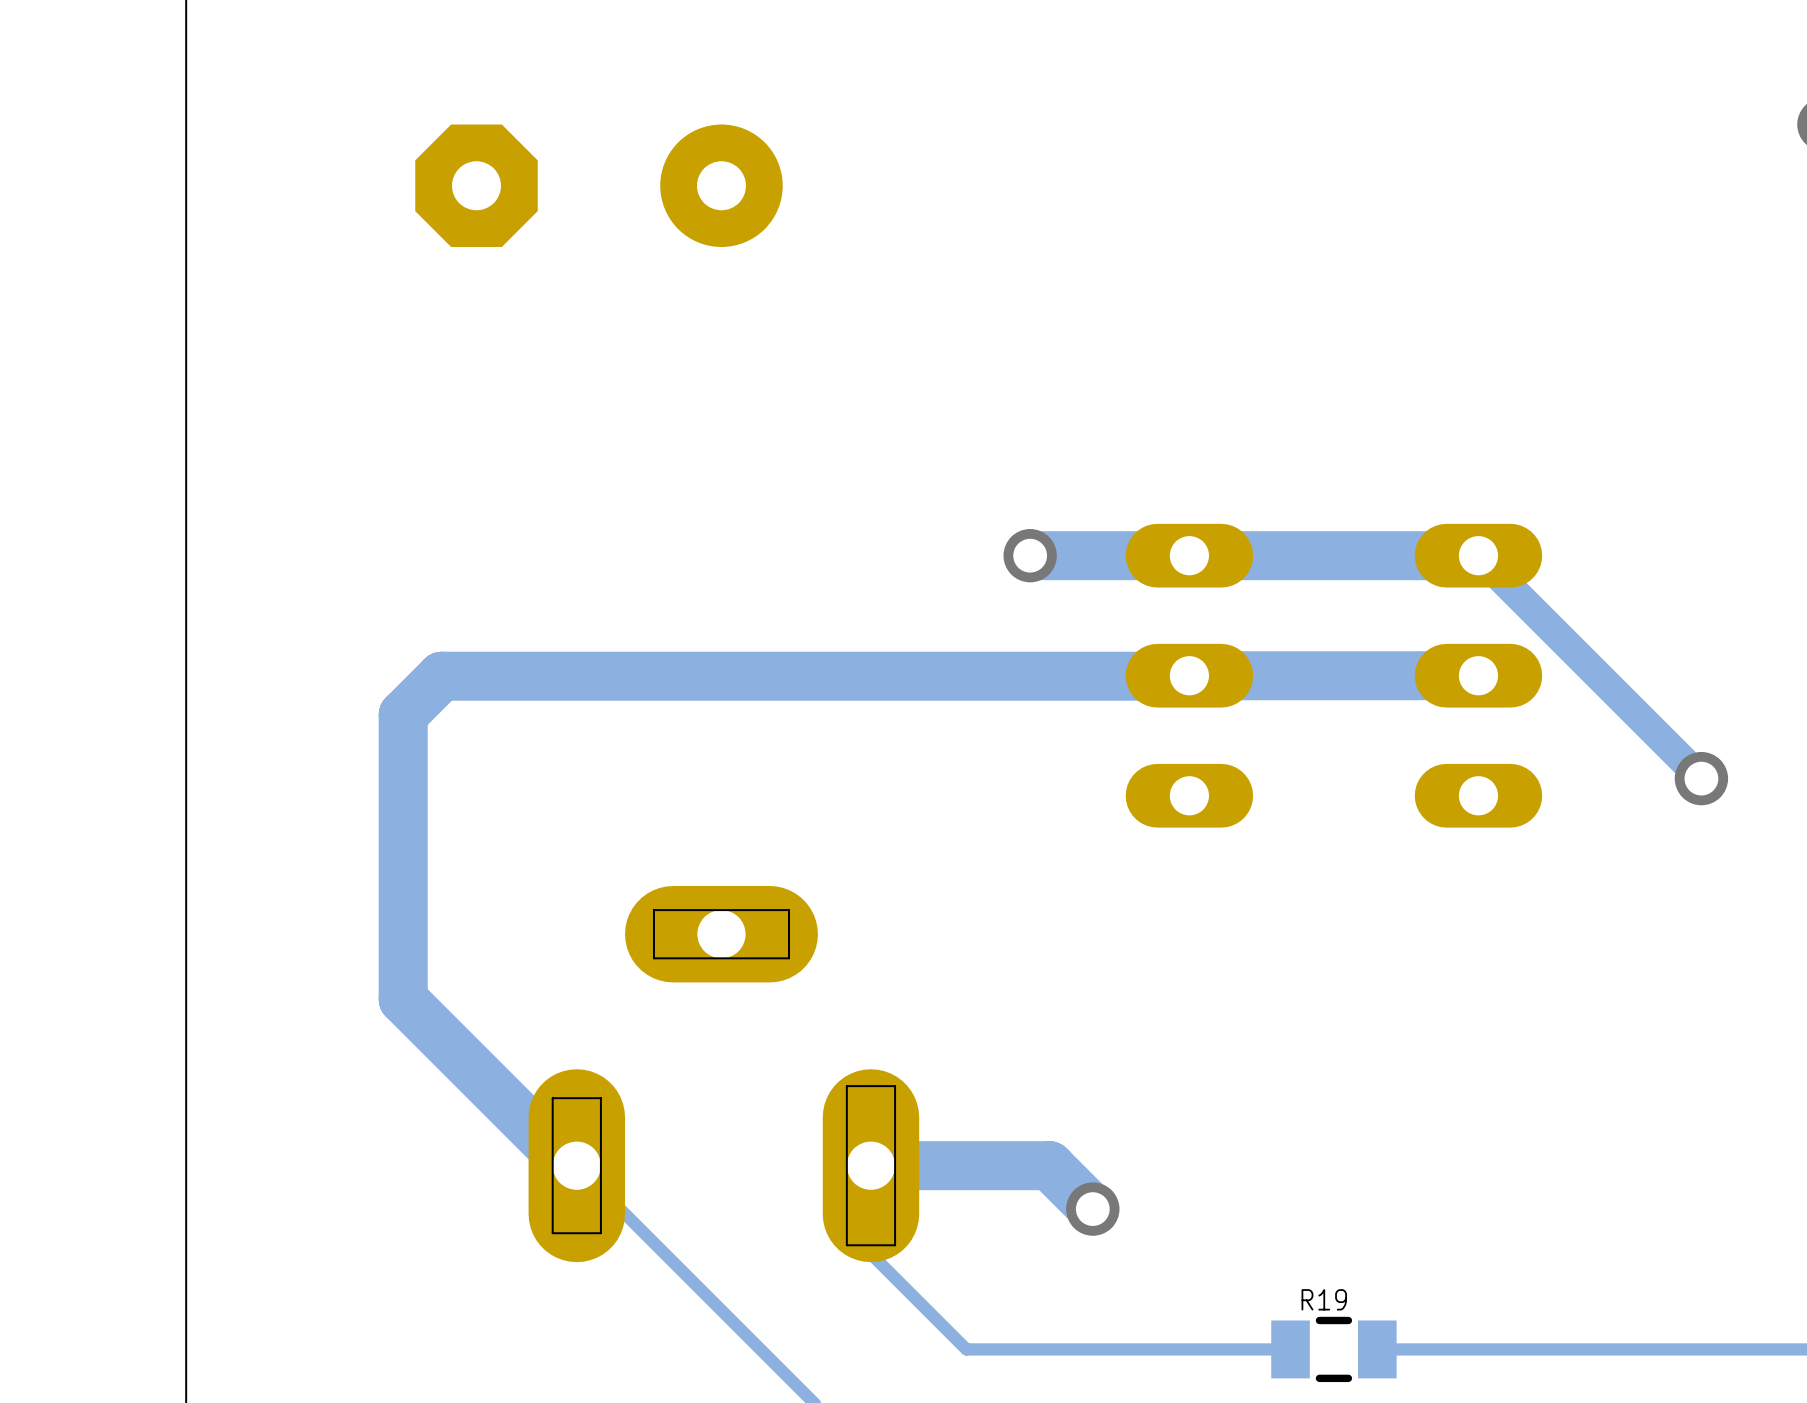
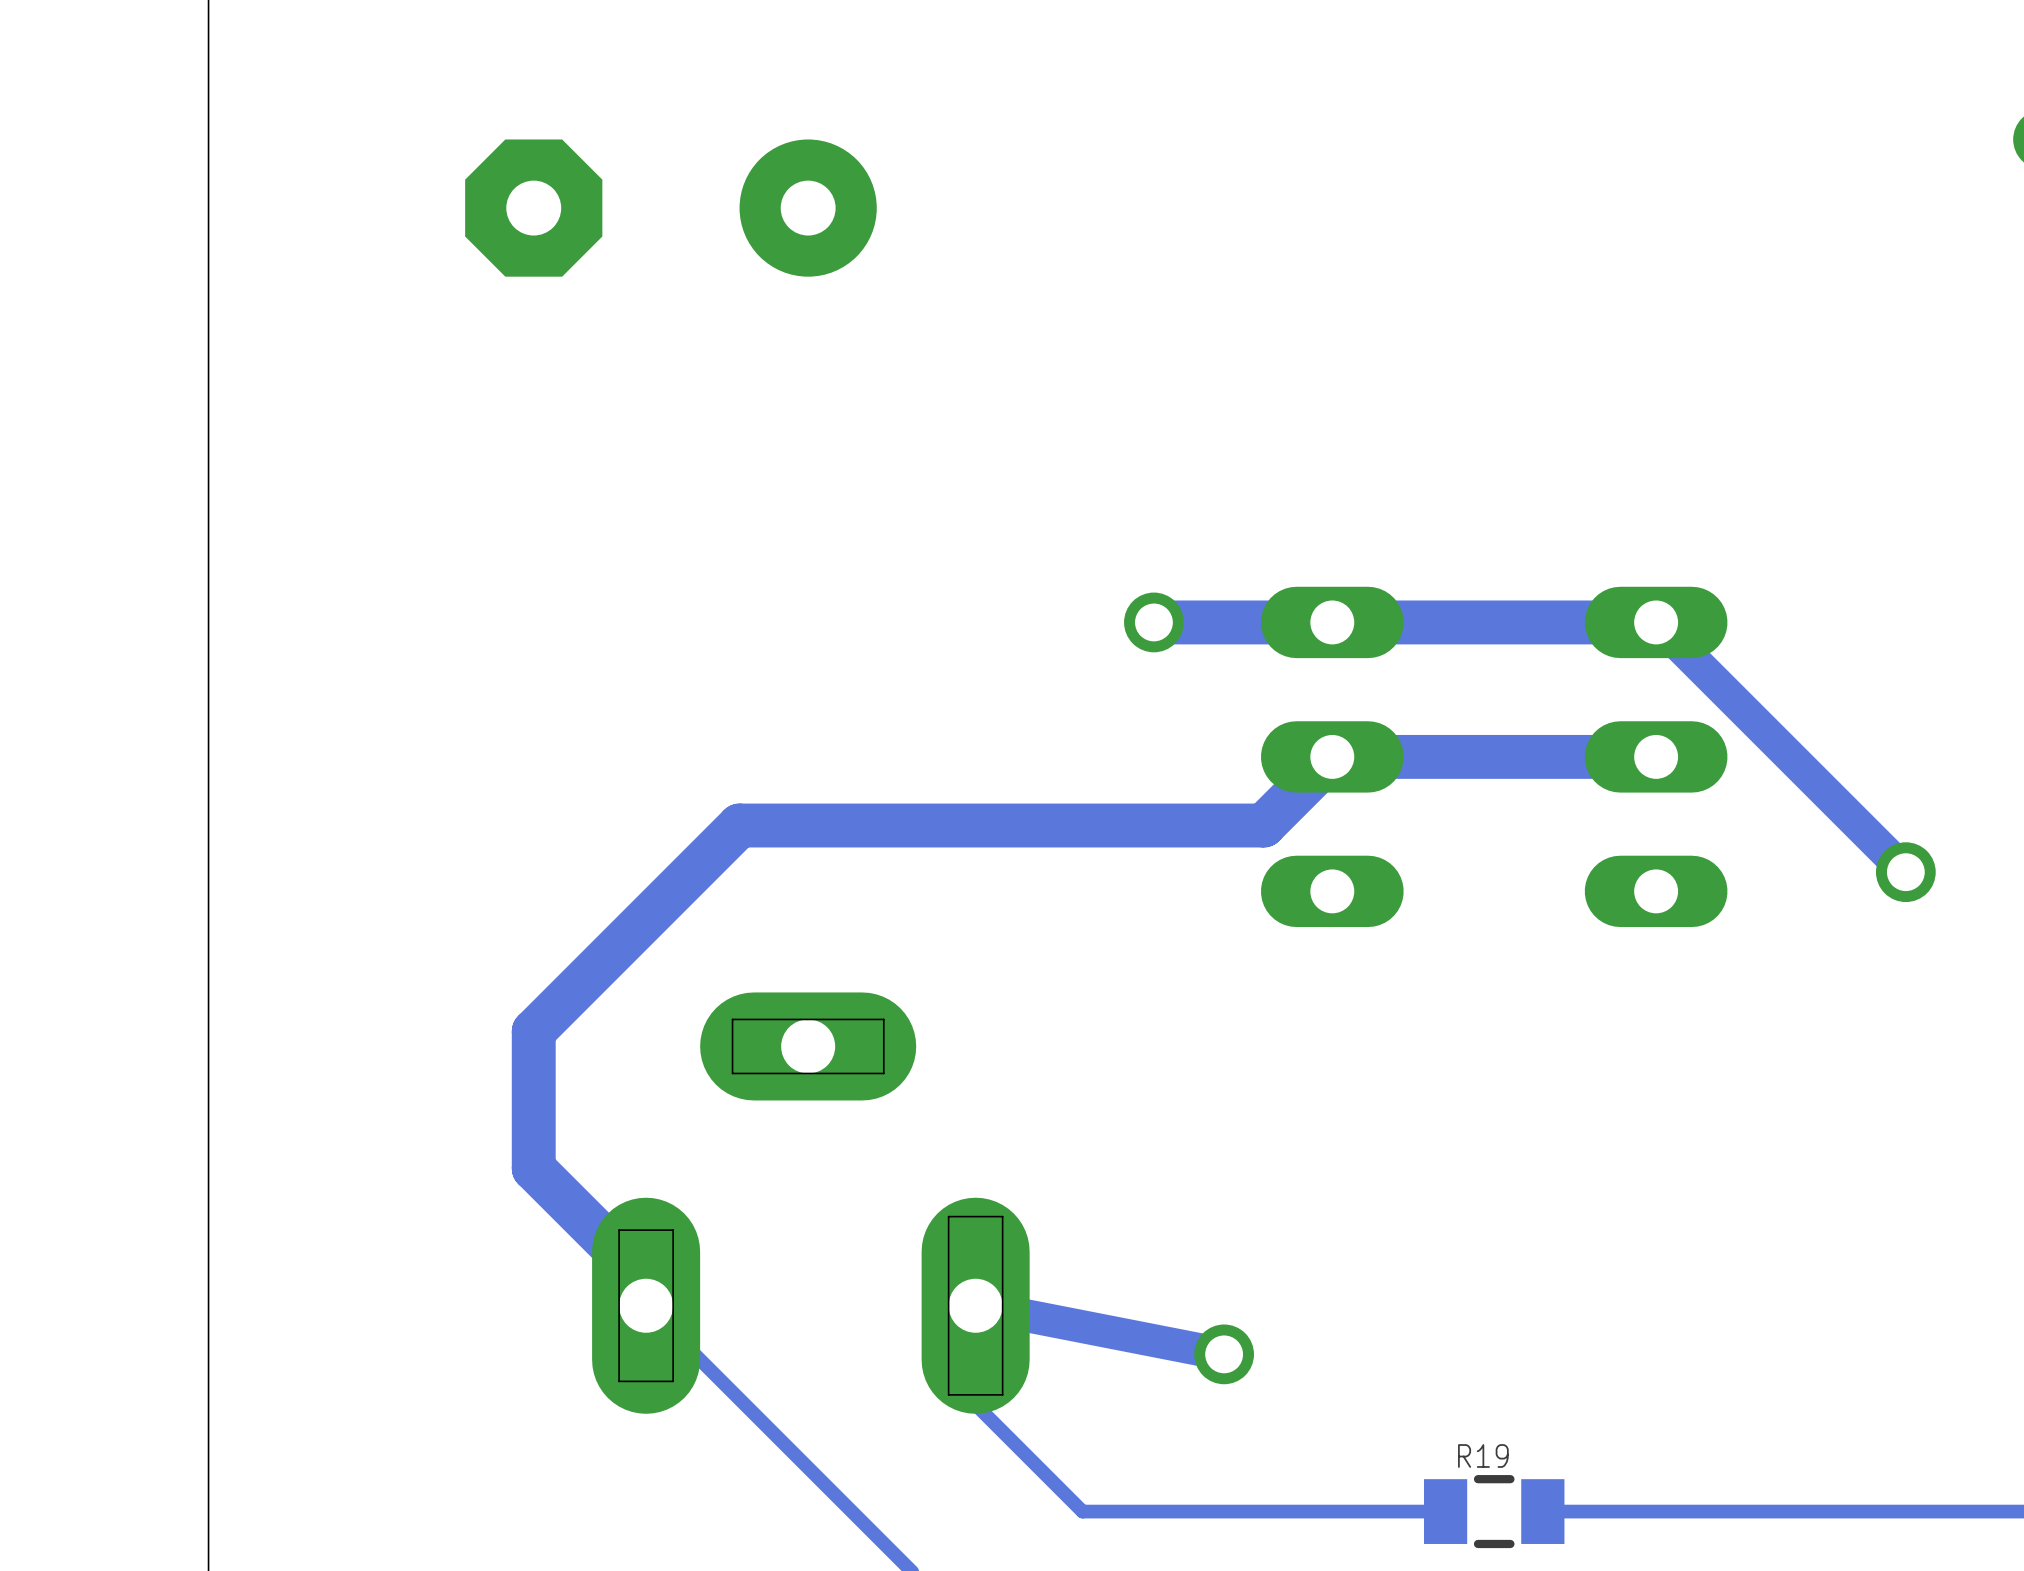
track width: thick (1478, 555) (1030, 555) -> thin (1656, 622) (1153, 622)
track width: thick (1478, 675) (1189, 675) -> thin (1656, 756) (1332, 756)
track: (1188, 676) (441, 676) (403, 714) (403, 999) (569, 1165) (576, 1165) -> (1332, 756) (1263, 825) (739, 825) (533, 1031) (533, 1168) (646, 1280) (646, 1305)
track: (870, 1165) (1049, 1165) (1092, 1209) -> (975, 1305) (1224, 1354)

